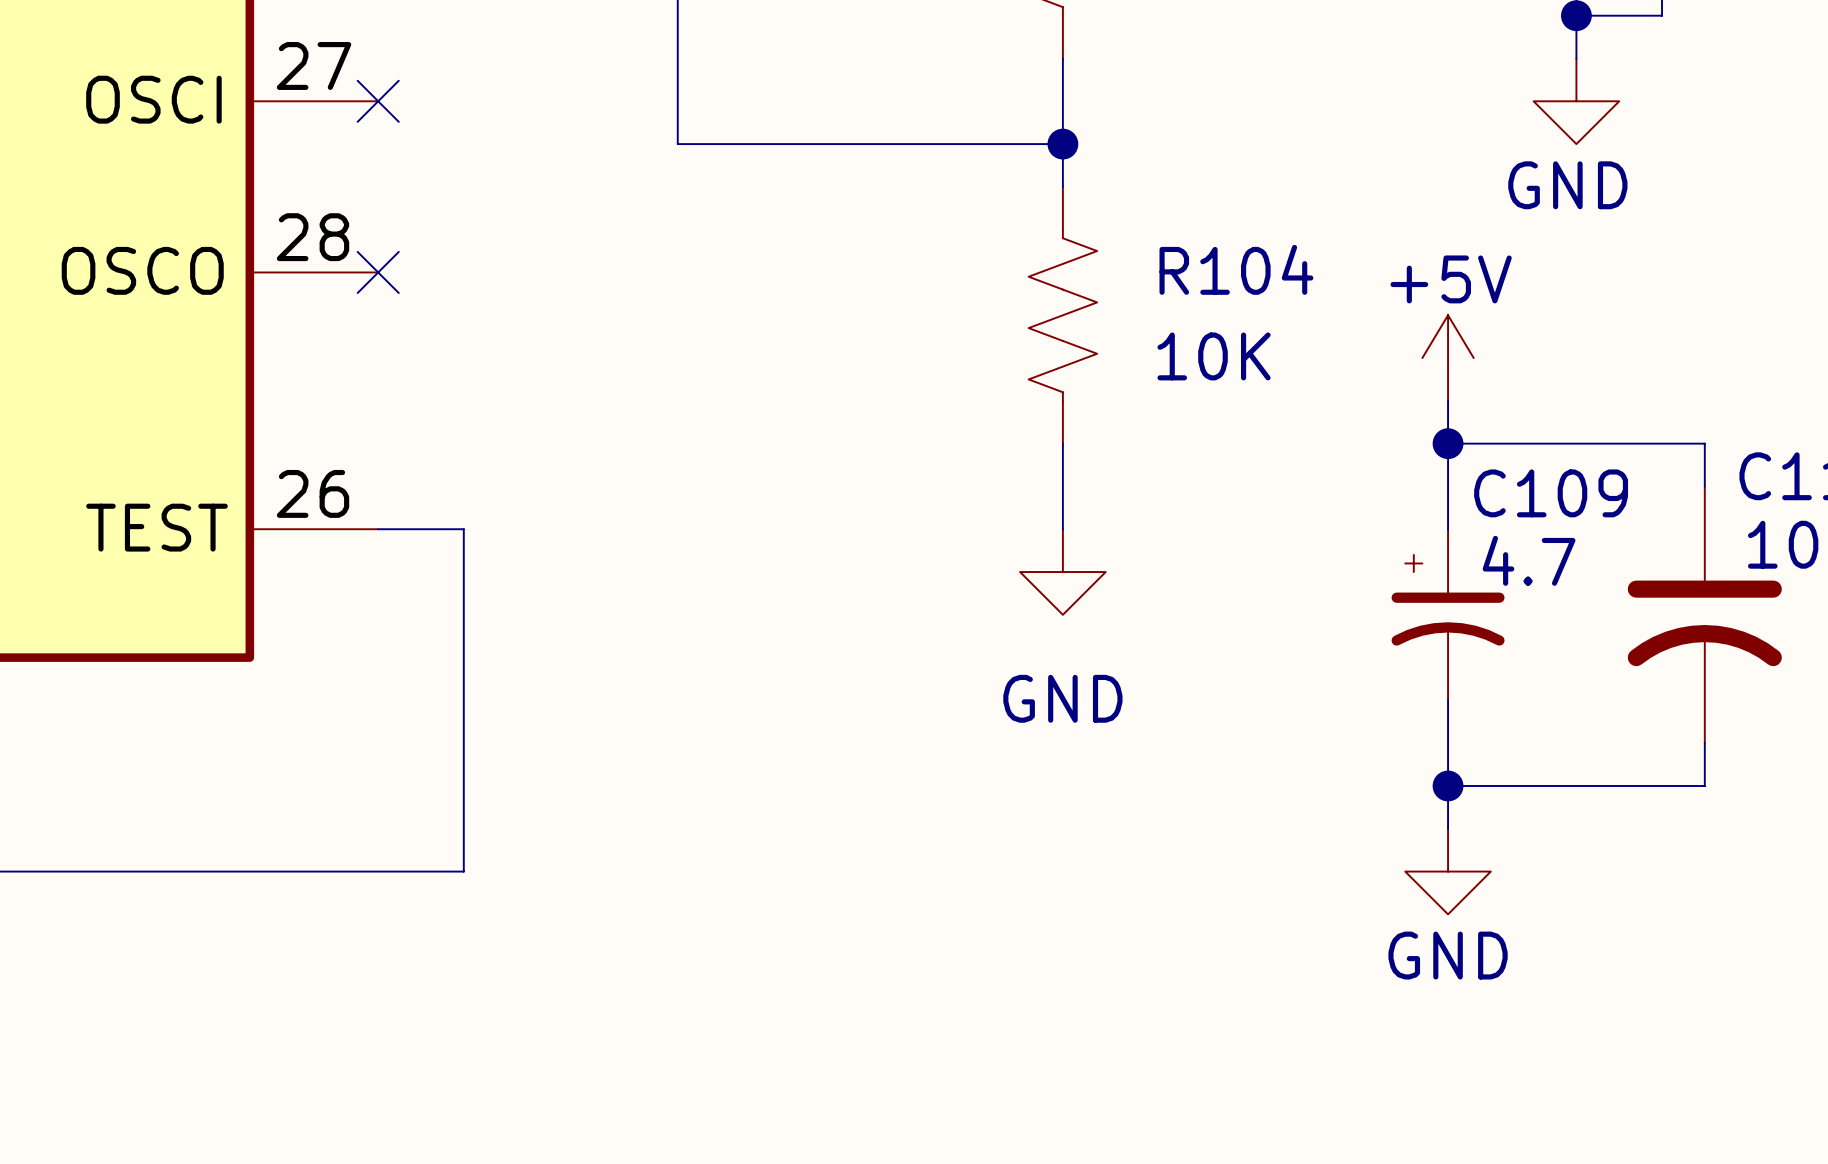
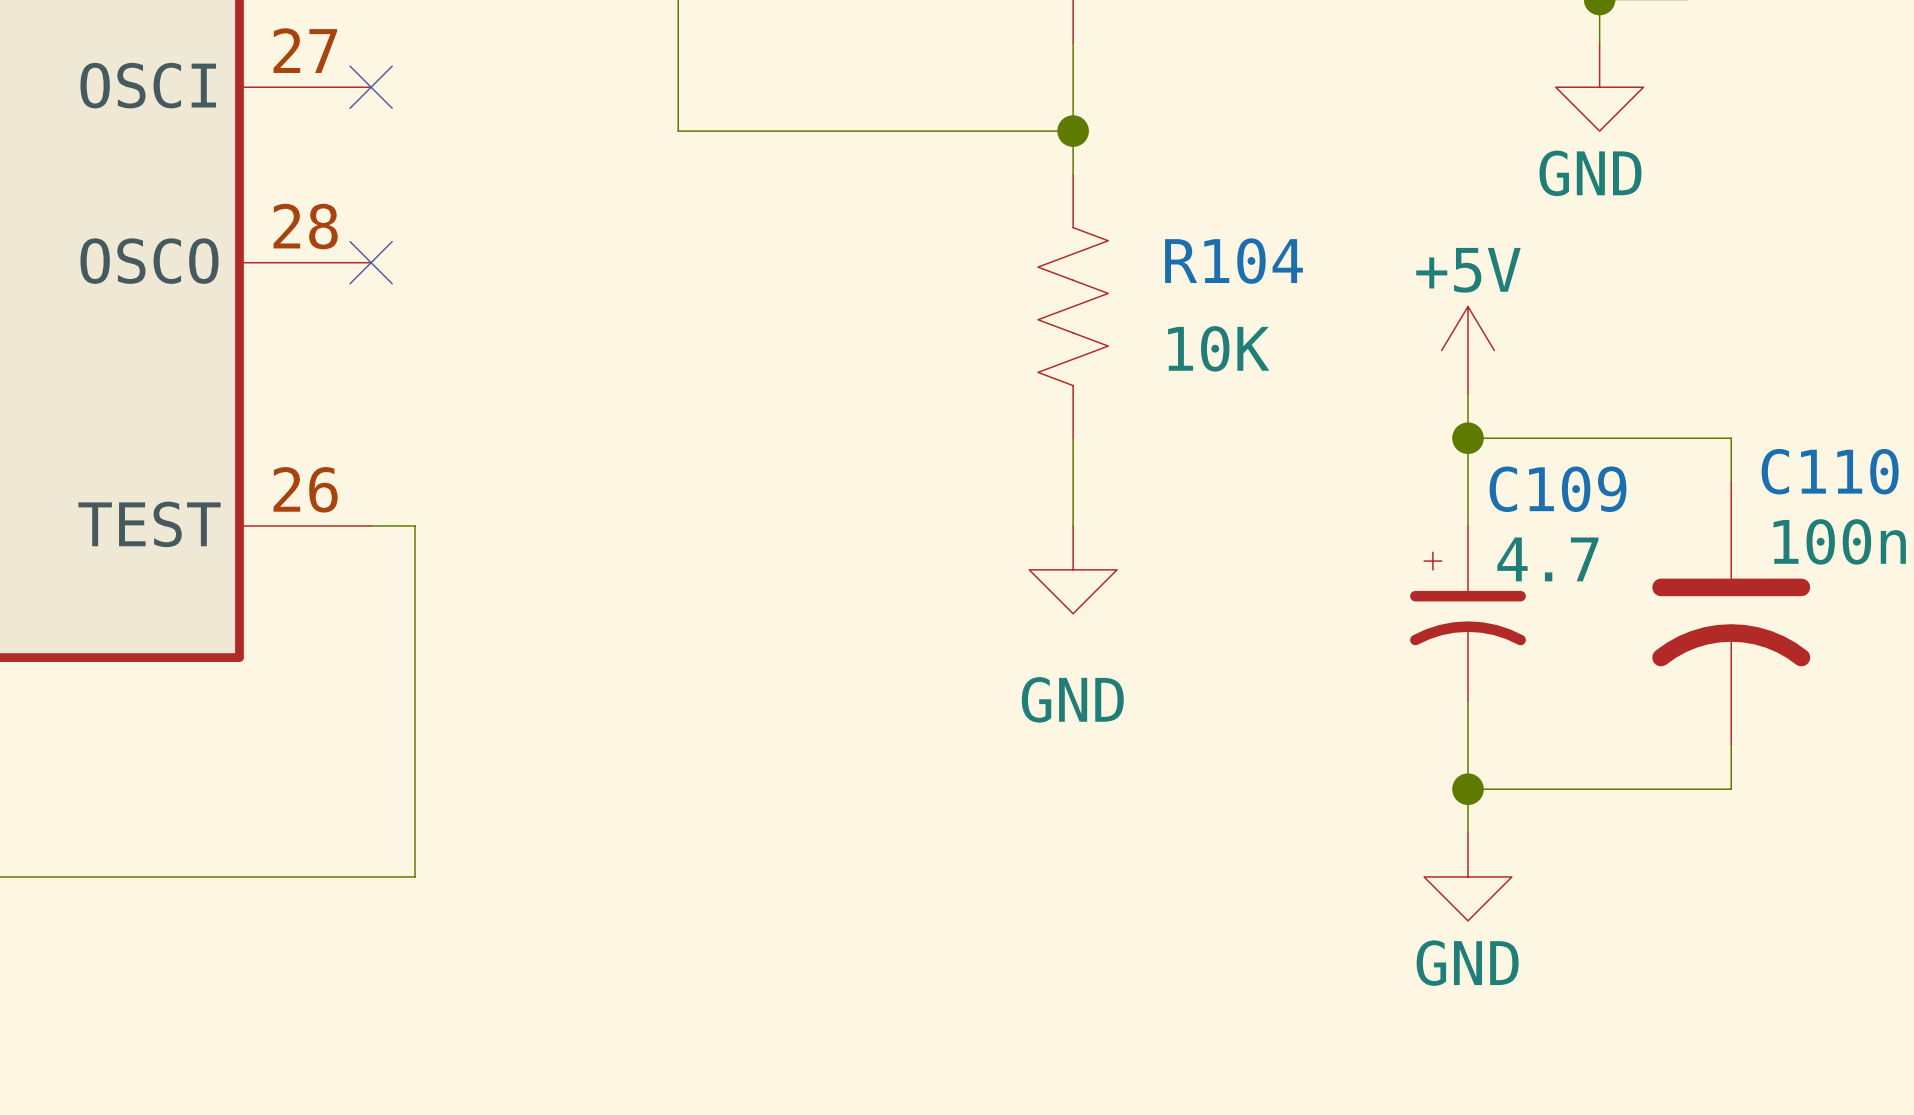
wire: (421, 529) (463, 529) (463, 871) (421, 871) -> (415, 525) (415, 876)

